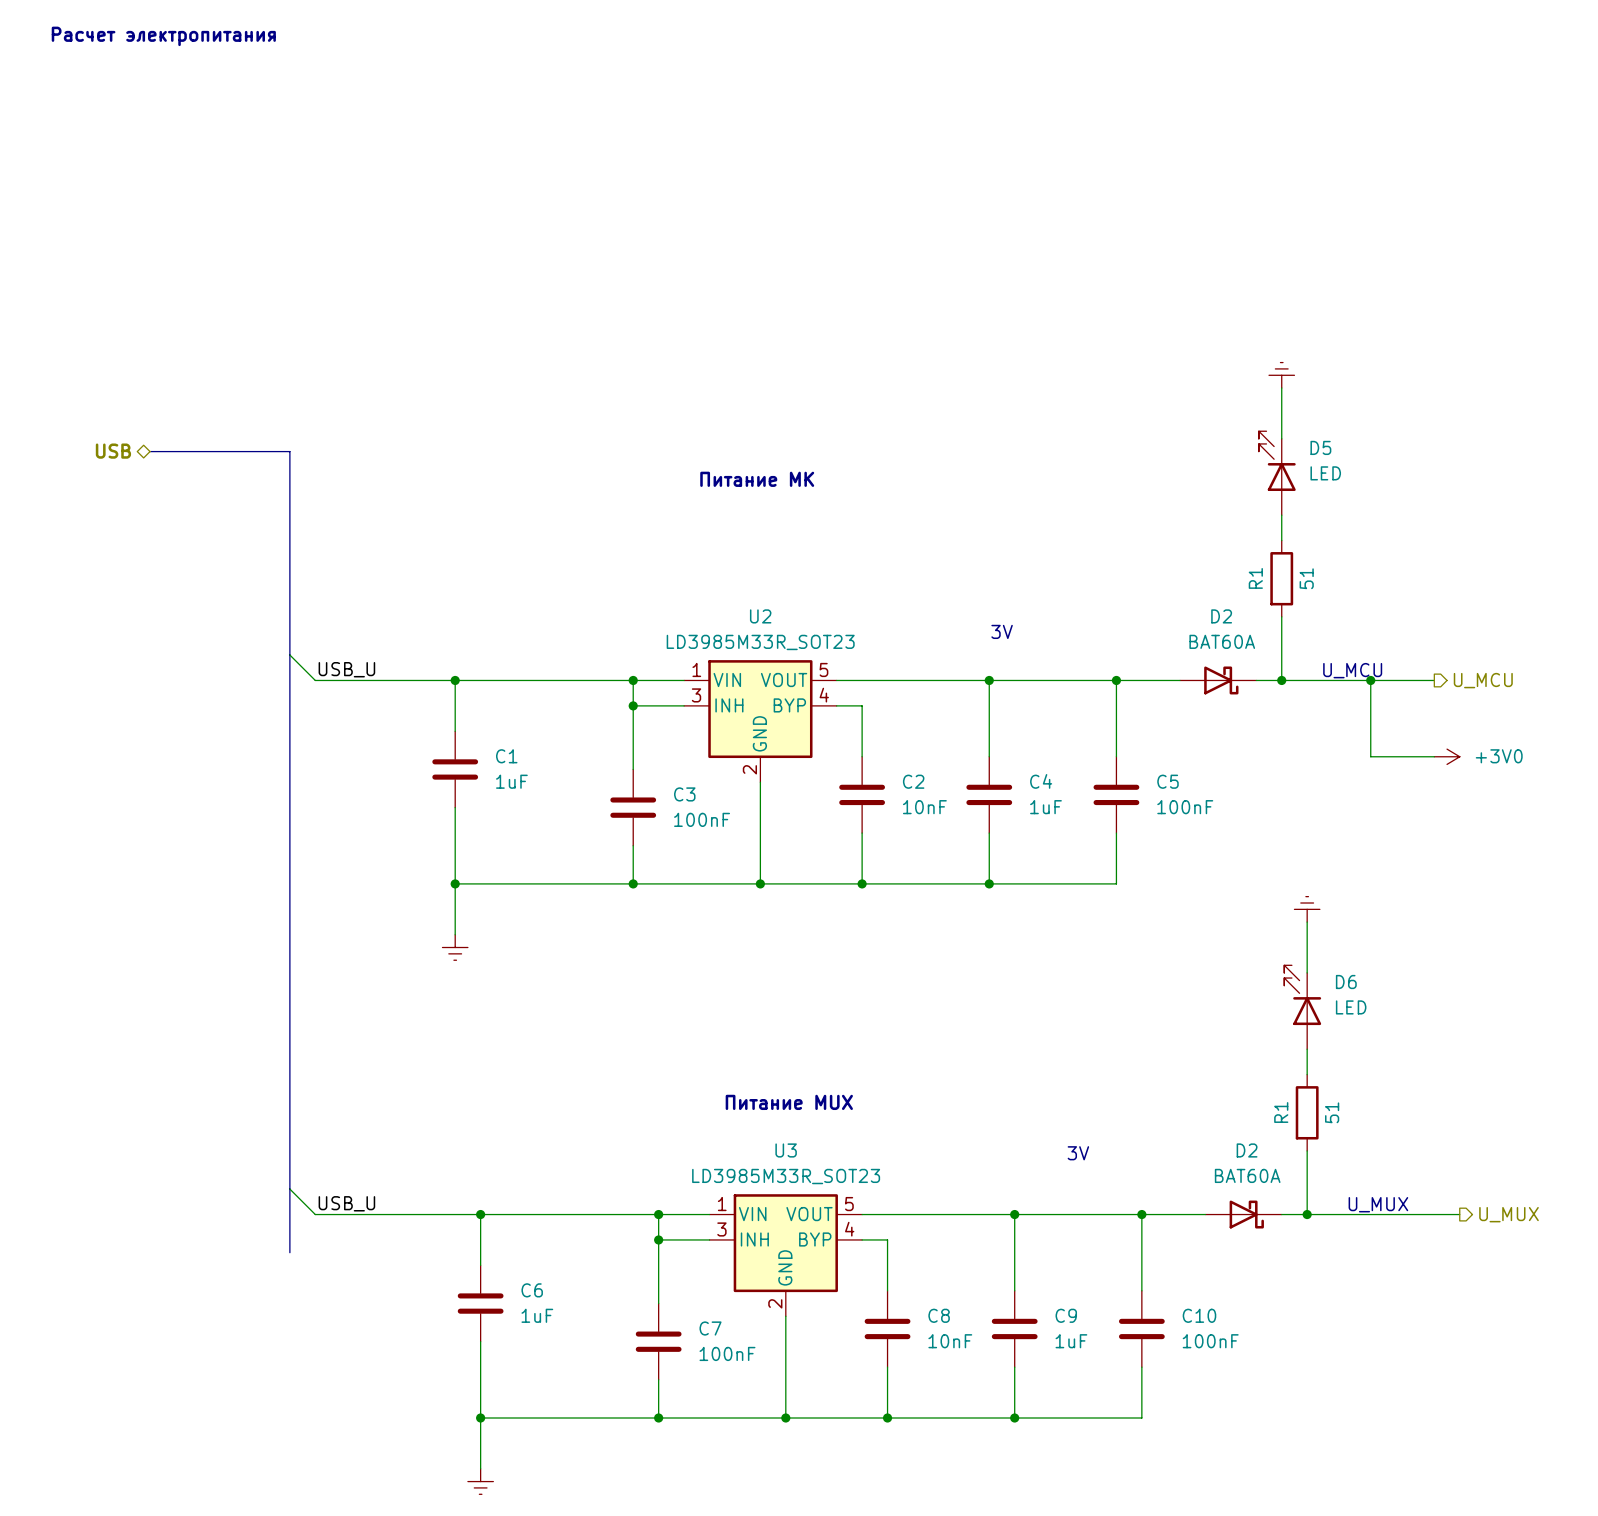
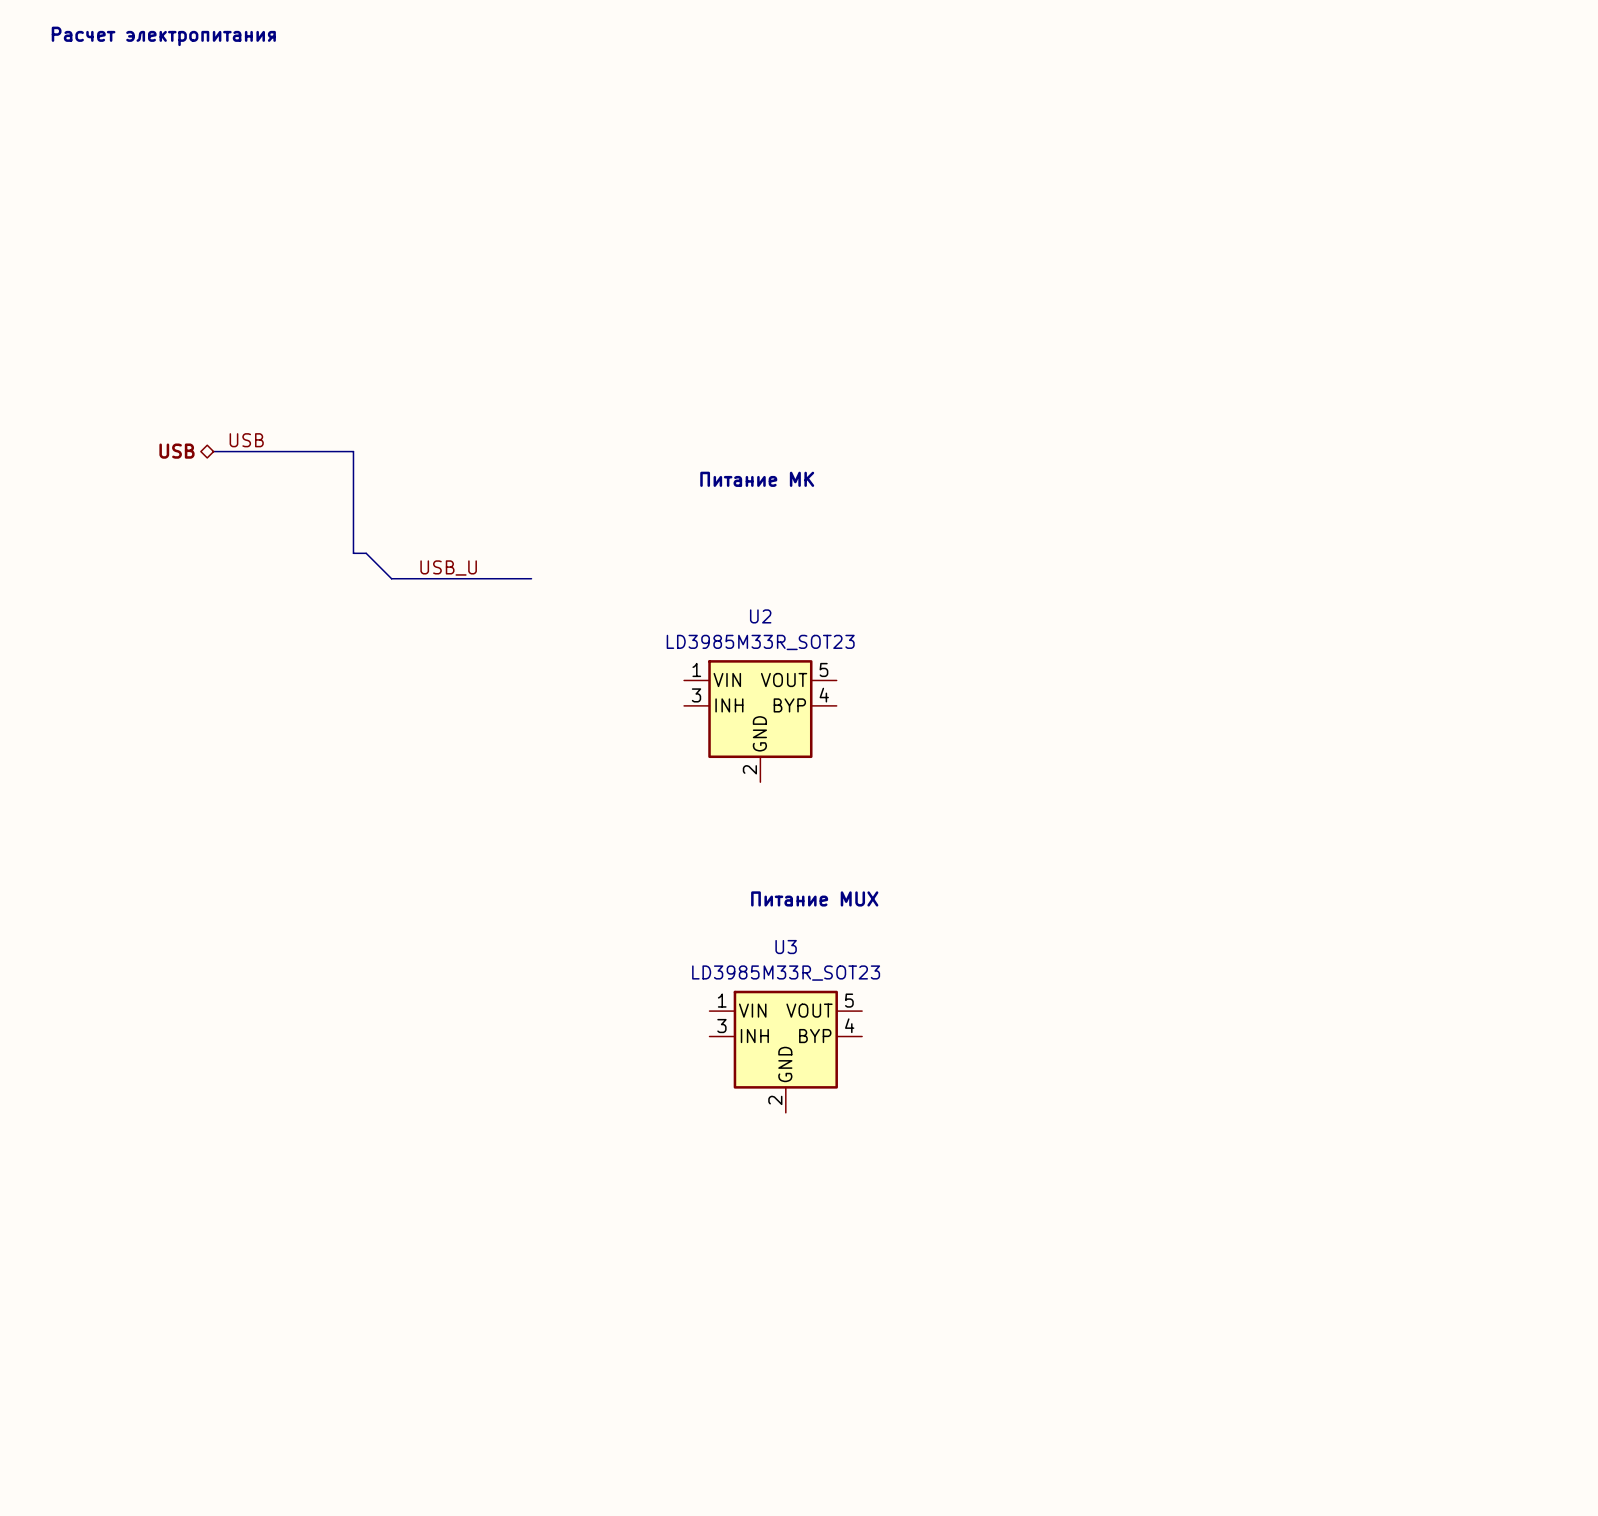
power symbol: (1281, 375) -> none
wire: (1281, 388) (1281, 438) -> none
label: none -> USB (246, 440)
hierarchical label position: USB (113, 451) -> USB (177, 451)
bus: (150, 451) (213, 451) -> none
bus: (289, 451) (289, 1252) -> (289, 451) (353, 451) (353, 553) (366, 553)
D5: LED (1277, 473) -> none
wire: (1281, 515) (1281, 540) -> none
wire: none -> (366, 553) (391, 578) (531, 578)
R1: 51 (1281, 578) -> none
wire: (1281, 616) (1281, 680) -> none
text: 3V (1002, 631) -> none
wire: (289, 655) (315, 680) (684, 680) -> none
label position: USB_U (346, 669) -> USB_U (448, 568)
text: U_MCU (1352, 670) -> none
wire: (455, 680) (455, 731) -> none
junction: (455, 680) -> none
wire: (633, 680) (633, 769) -> none
junction: (633, 680) -> none
wire: (836, 680) (1180, 680) -> none
wire: (989, 680) (989, 756) -> none
junction: (989, 680) -> none
wire: (1116, 680) (1116, 756) -> none
junction: (1116, 680) -> none
D2: BAT60A (1218, 680) -> none
wire: (1256, 680) (1434, 680) -> none
junction: (1281, 680) -> none
wire: (1370, 680) (1370, 756) (1434, 756) -> none
junction: (1370, 680) -> none
hierarchical label: U_MCU (1483, 680) -> none
wire: (633, 705) (684, 705) -> none
junction: (633, 705) -> none
wire: (836, 705) (862, 705) (862, 756) -> none
power symbol: +3V0 (1447, 756) -> none
C1: 1uF (455, 769) -> none
wire: (760, 782) (760, 883) -> none
C2: 10nF (862, 794) -> none
C4: 1uF (989, 794) -> none
C5: 100nF (1116, 794) -> none
wire: (455, 807) (455, 934) -> none
C3: 100nF (633, 807) -> none
wire: (862, 833) (862, 883) -> none
wire: (989, 833) (989, 883) -> none
wire: (1116, 833) (1116, 883) (455, 883) -> none
wire: (633, 845) (633, 883) -> none
junction: (455, 883) -> none
junction: (633, 883) -> none
junction: (760, 883) -> none
junction: (862, 883) -> none
junction: (989, 883) -> none
power symbol: (1307, 909) -> none
wire: (1307, 922) (1307, 972) -> none
power symbol: (455, 947) -> none
D6: LED (1302, 1007) -> none
wire: (1307, 1049) (1307, 1074) -> none
text position: Питание МUX (789, 1102) -> Питание МUX (814, 898)
R1: 51 (1307, 1112) -> none
wire: (1307, 1150) (1307, 1214) -> none
text: 3V (1078, 1153) -> none
wire: (289, 1189) (315, 1214) (709, 1214) -> none
label: USB_U (346, 1203) -> none
text: U_MUX (1378, 1204) -> none
wire: (480, 1214) (480, 1265) -> none
junction: (480, 1214) -> none
wire: (658, 1214) (658, 1303) -> none
junction: (658, 1214) -> none
wire: (862, 1214) (1205, 1214) -> none
wire: (1014, 1214) (1014, 1290) -> none
junction: (1014, 1214) -> none
wire: (1141, 1214) (1141, 1290) -> none
junction: (1141, 1214) -> none
D2: BAT60A (1243, 1214) -> none
wire: (1281, 1214) (1459, 1214) -> none
junction: (1307, 1214) -> none
hierarchical label: U_MUX (1509, 1214) -> none
wire: (658, 1239) (709, 1239) -> none
junction: (658, 1239) -> none
wire: (862, 1239) (887, 1239) (887, 1290) -> none
U3 position: (785, 1255) -> (785, 1051)
C6: 1uF (480, 1303) -> none
wire: (785, 1316) (785, 1417) -> none
C8: 10nF (887, 1328) -> none
C9: 1uF (1014, 1328) -> none
C10: 100nF (1141, 1328) -> none
wire: (480, 1341) (480, 1468) -> none
C7: 100nF (658, 1341) -> none
wire: (887, 1367) (887, 1417) -> none
wire: (1014, 1367) (1014, 1417) -> none
wire: (1141, 1367) (1141, 1417) (480, 1417) -> none
wire: (658, 1379) (658, 1417) -> none
junction: (480, 1417) -> none
junction: (658, 1417) -> none
junction: (785, 1417) -> none
junction: (887, 1417) -> none
junction: (1014, 1417) -> none
power symbol: (480, 1481) -> none

